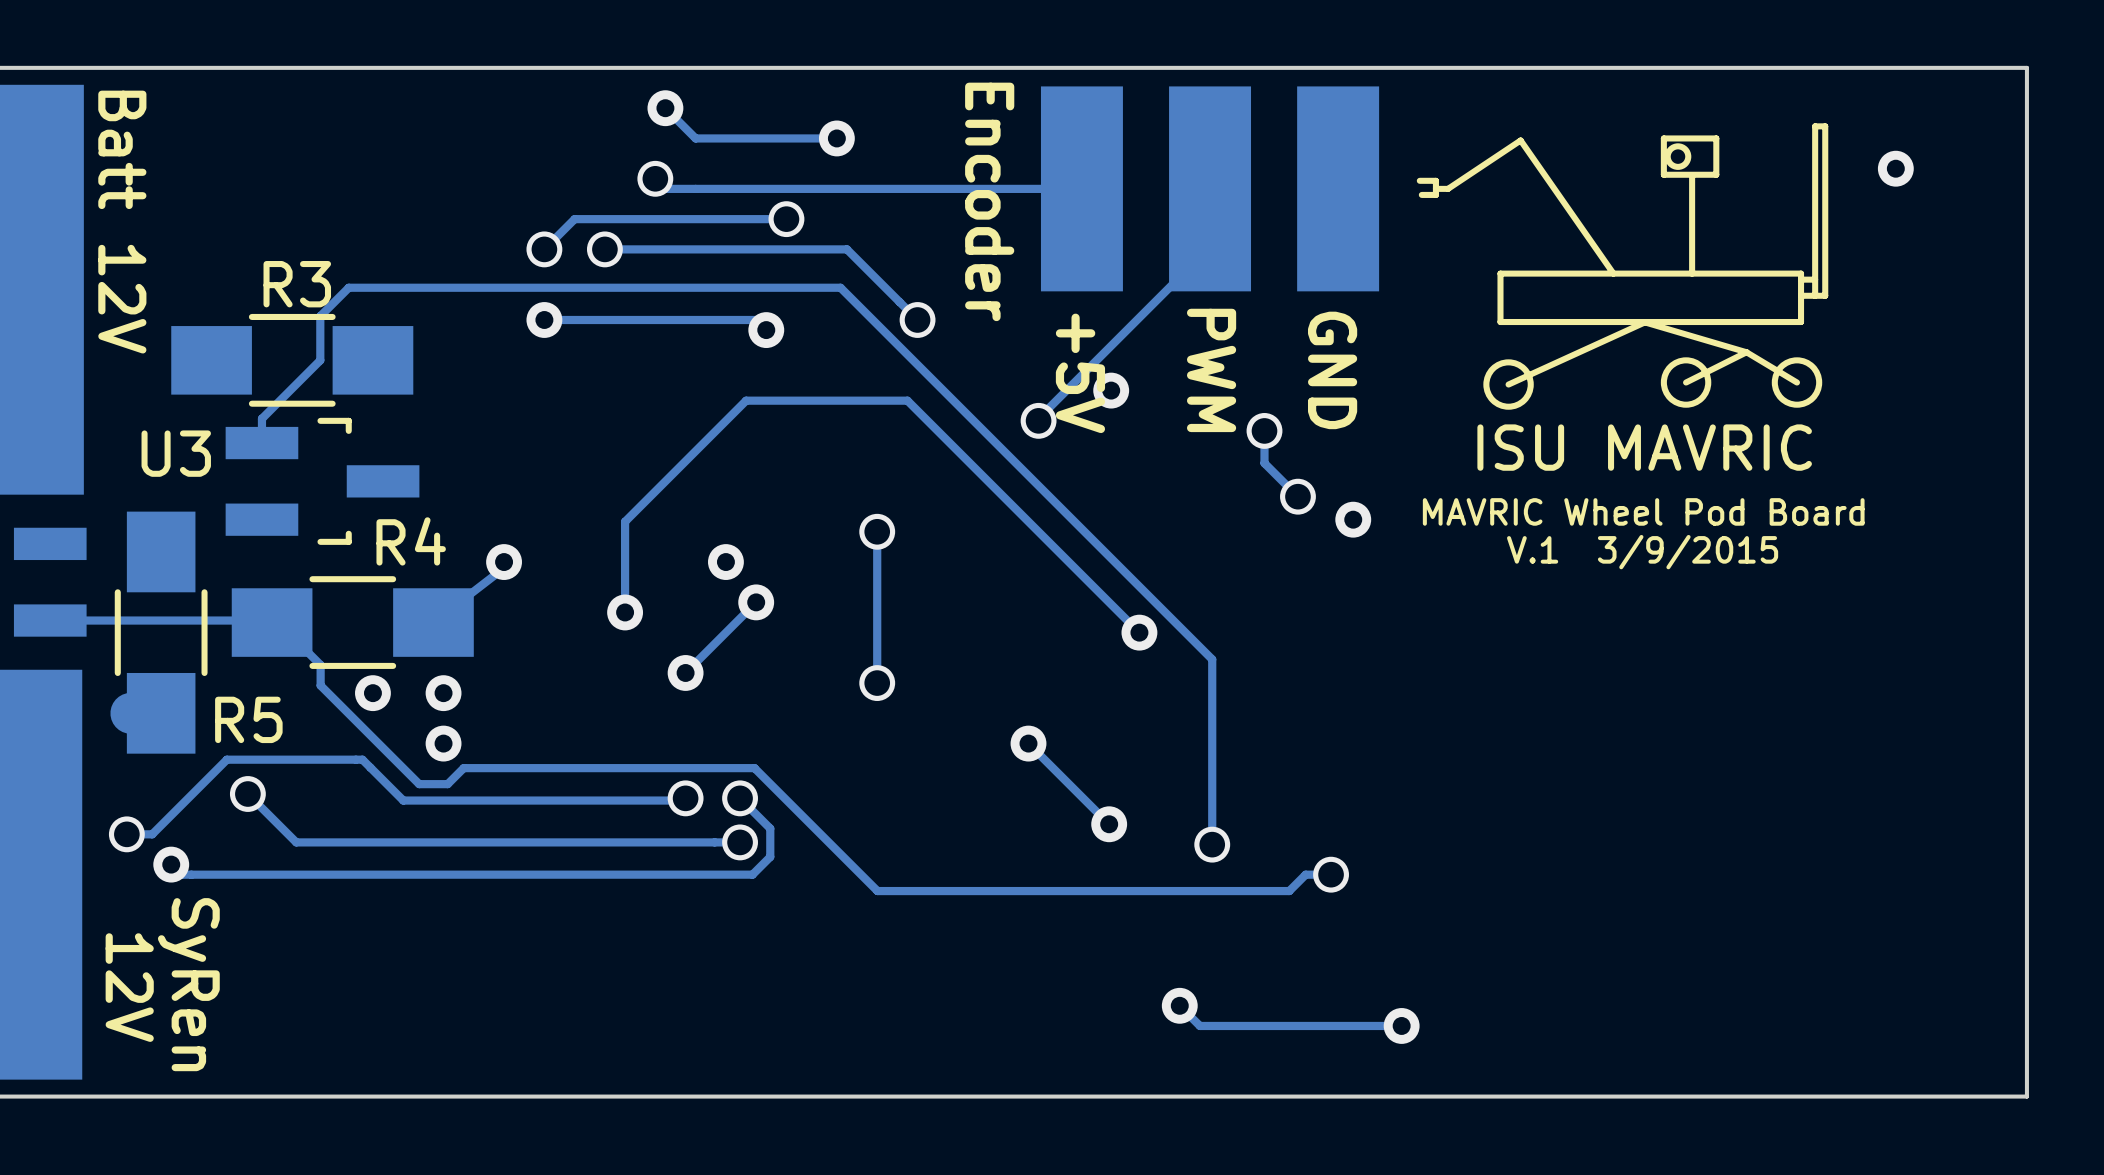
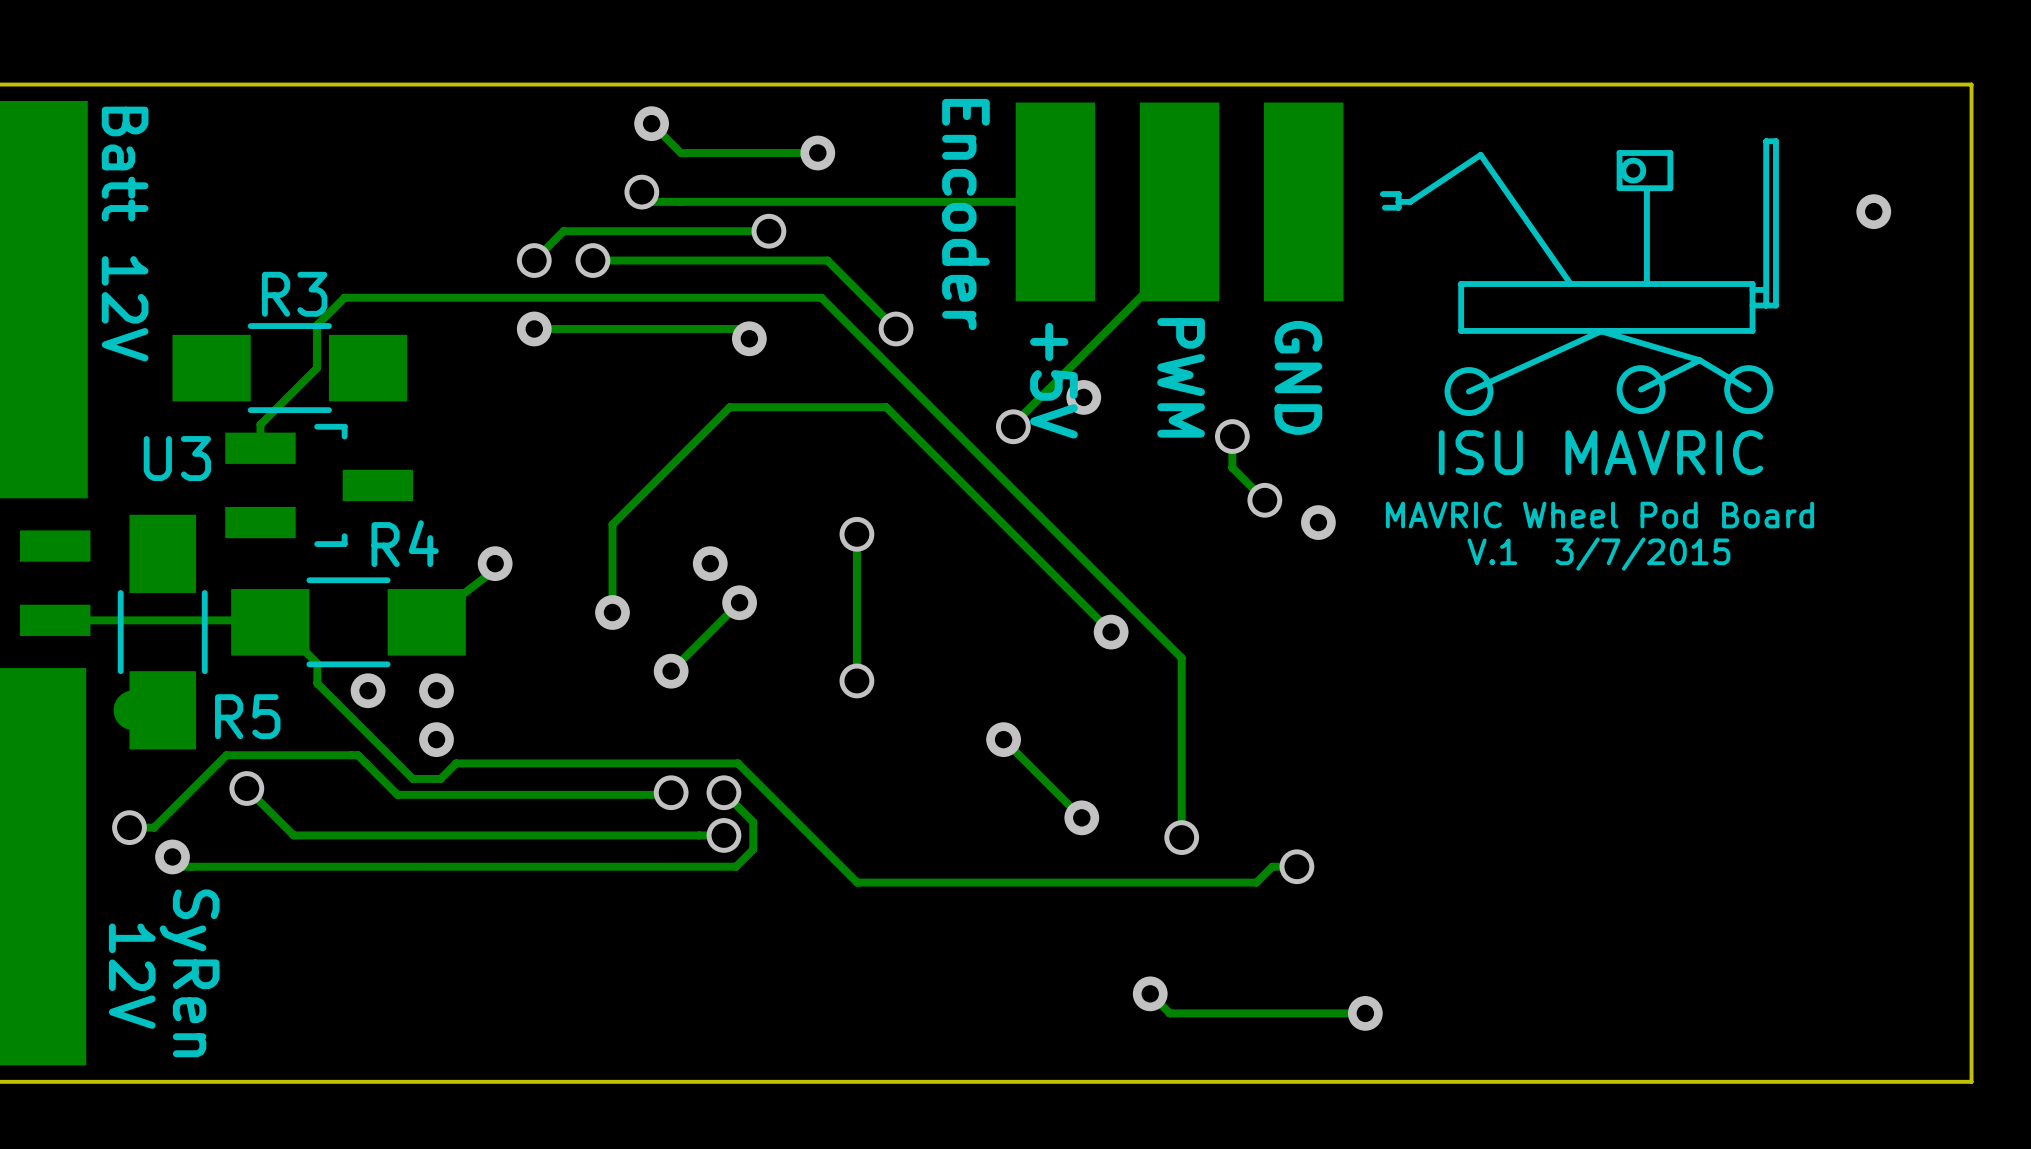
via position: (1895, 168) -> (1873, 211)
text: V.1 3/9/2015 (1642, 552) -> V.1 3/7/2015 (1598, 554)

